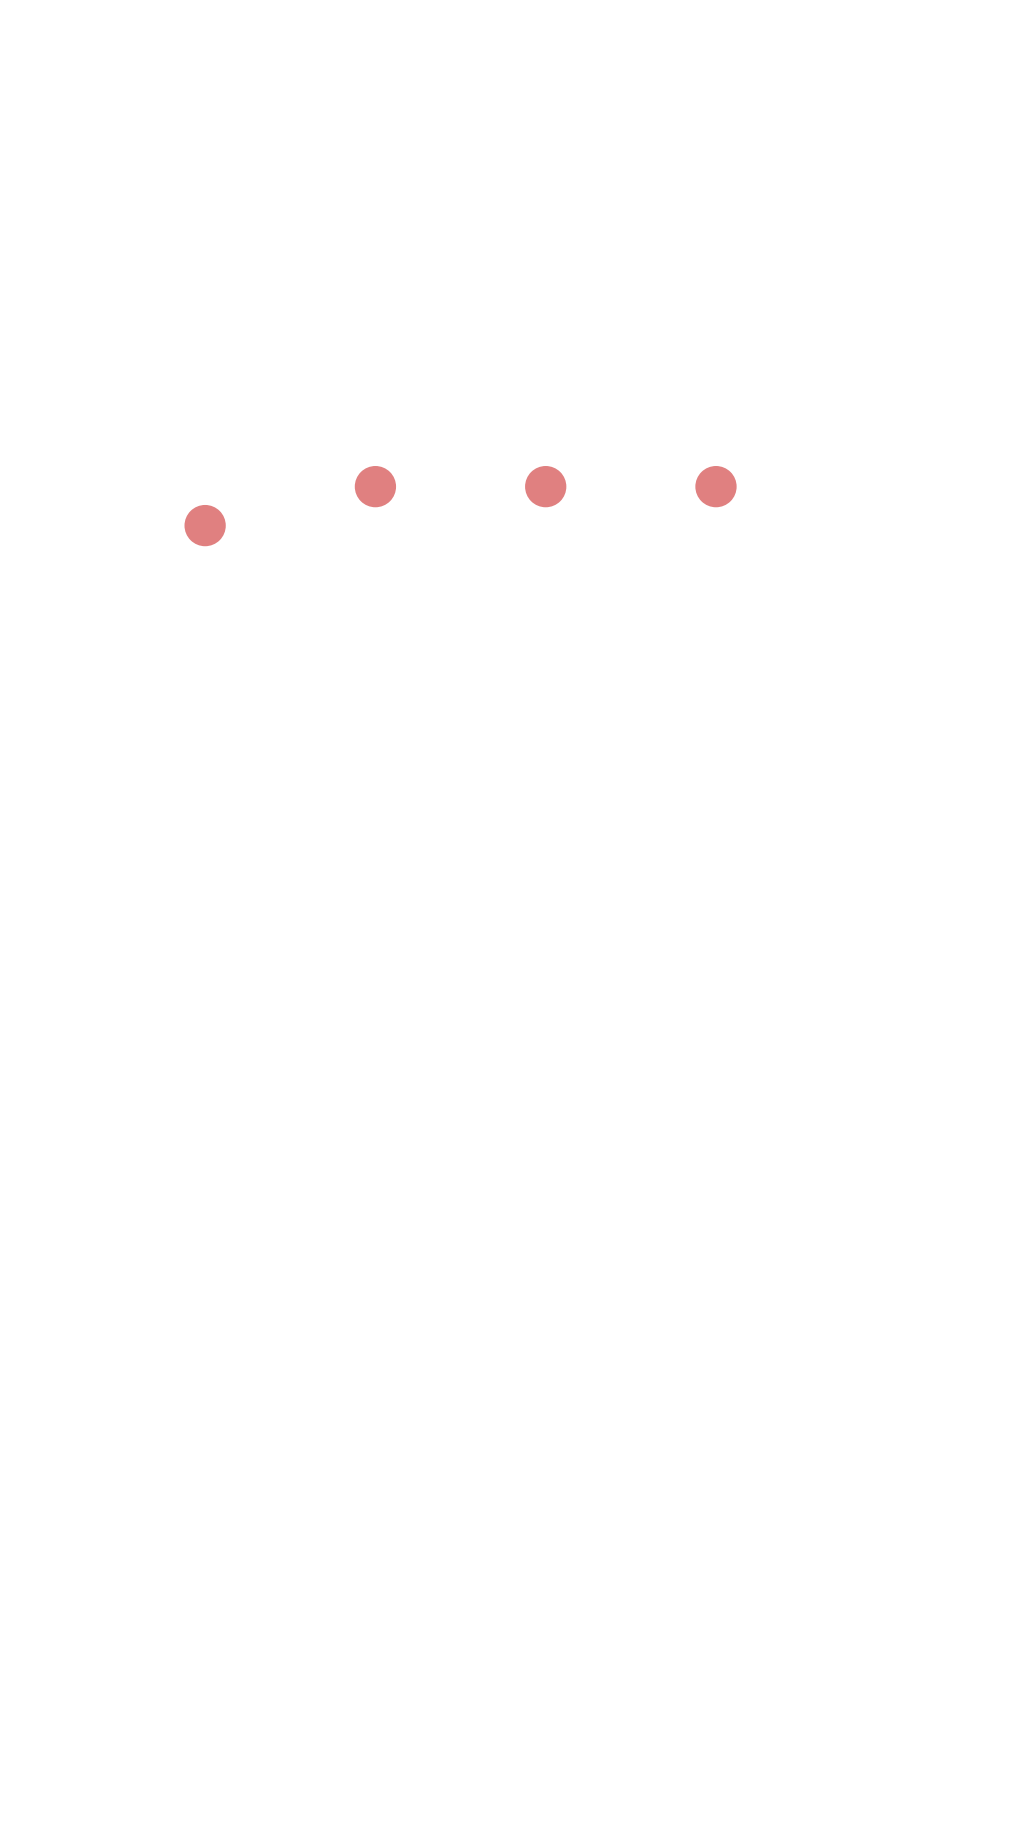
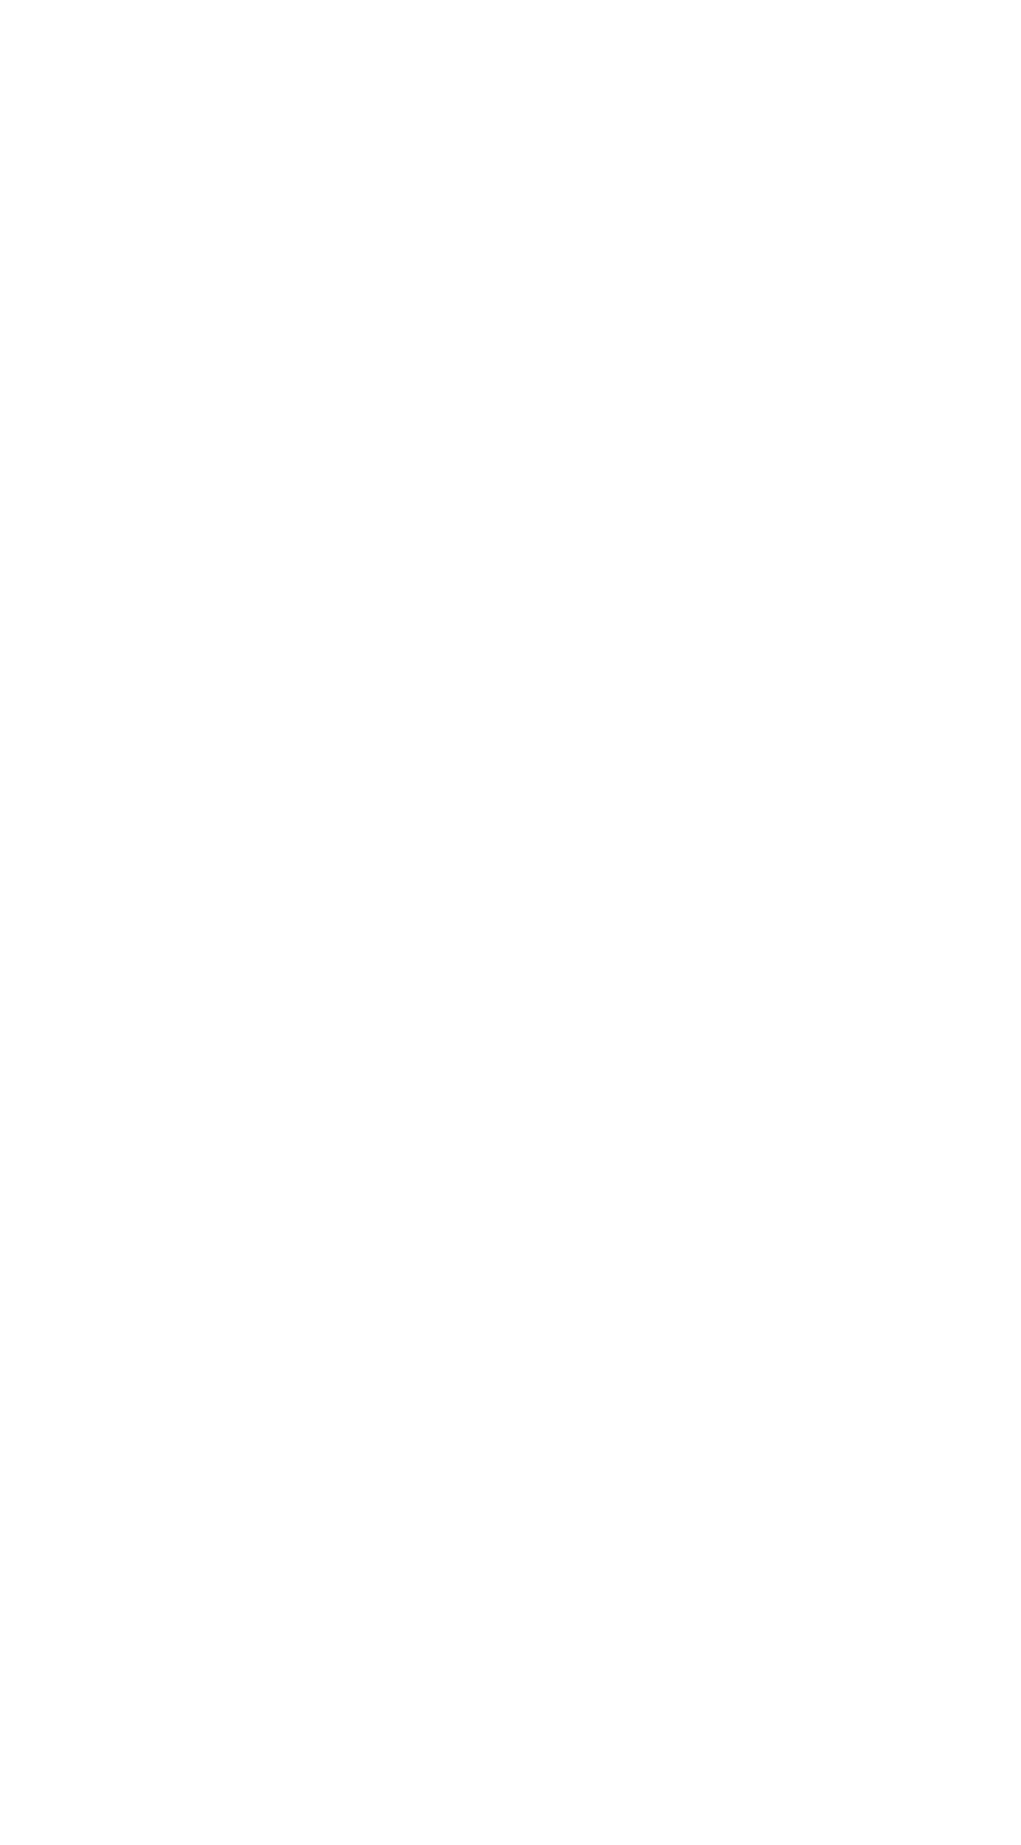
part: (375, 486) -> none
part: (545, 486) -> none
part: (715, 486) -> none
part: (205, 525) -> none

